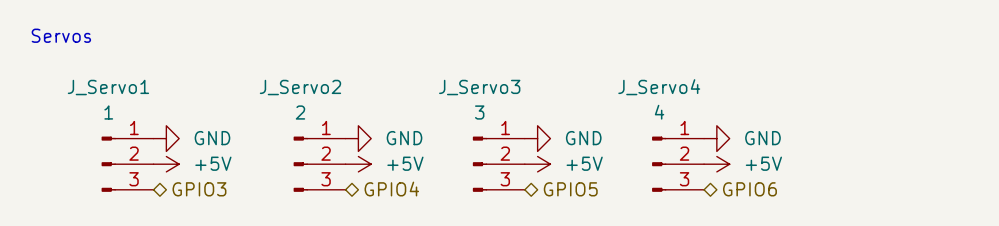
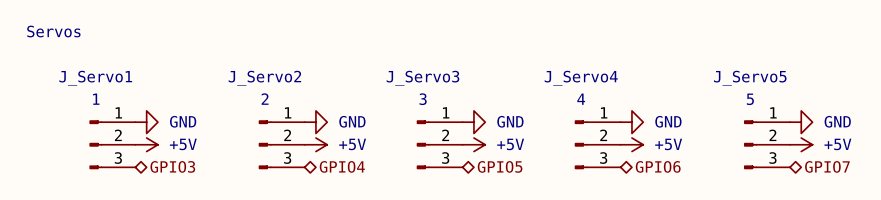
power symbol: none -> GND (801, 122)
J_Servo5: none -> 5 (767, 144)
power symbol: none -> +5V (801, 144)
hierarchical label: none -> GPIO7 (827, 166)

